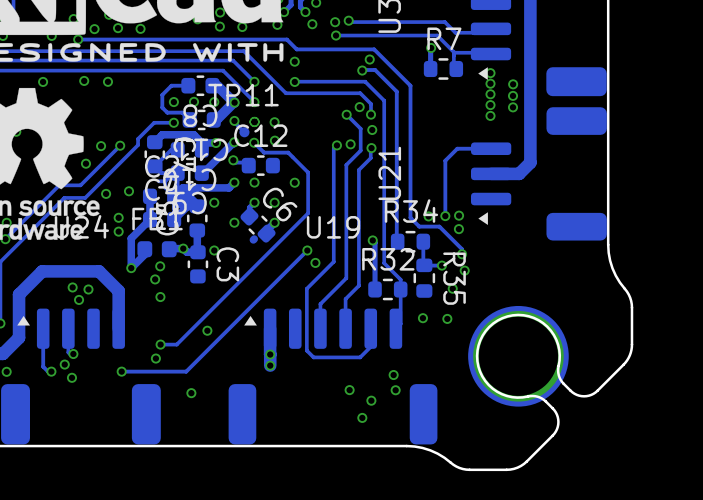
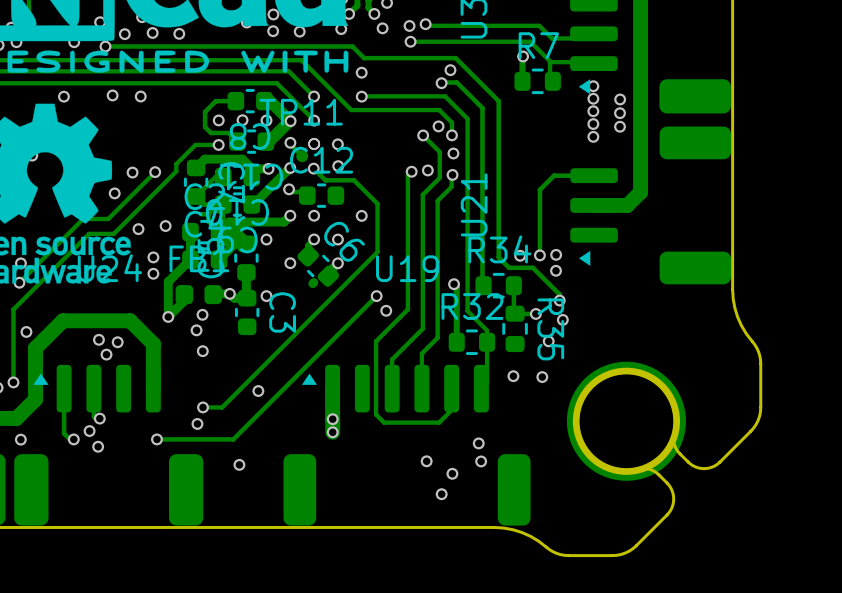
via: none -> (26, 331)

